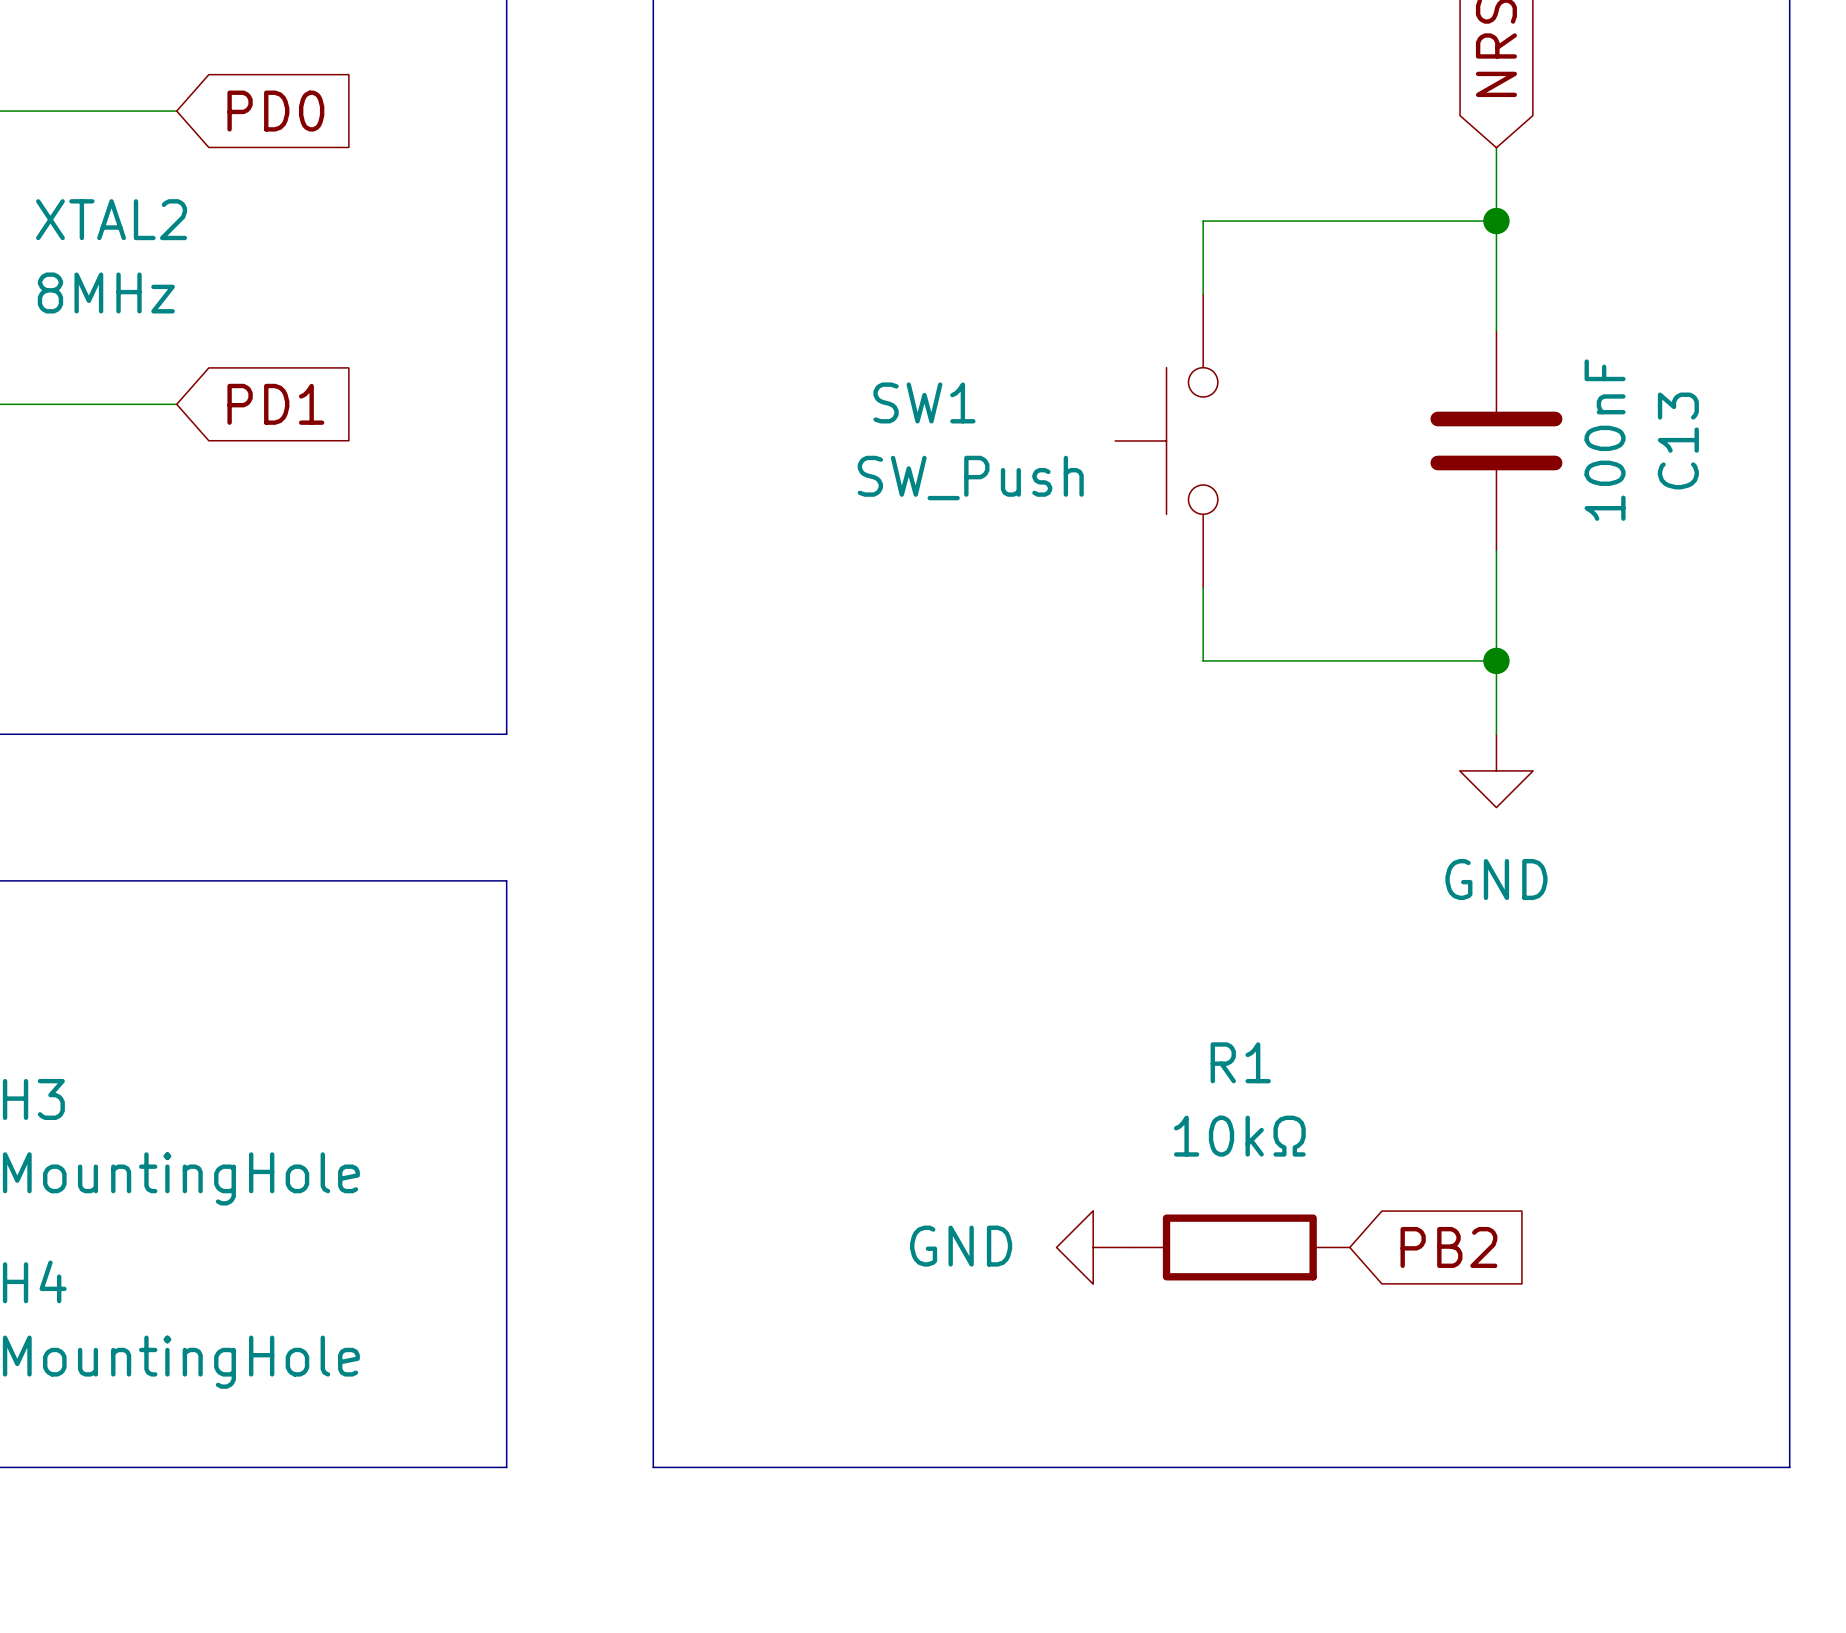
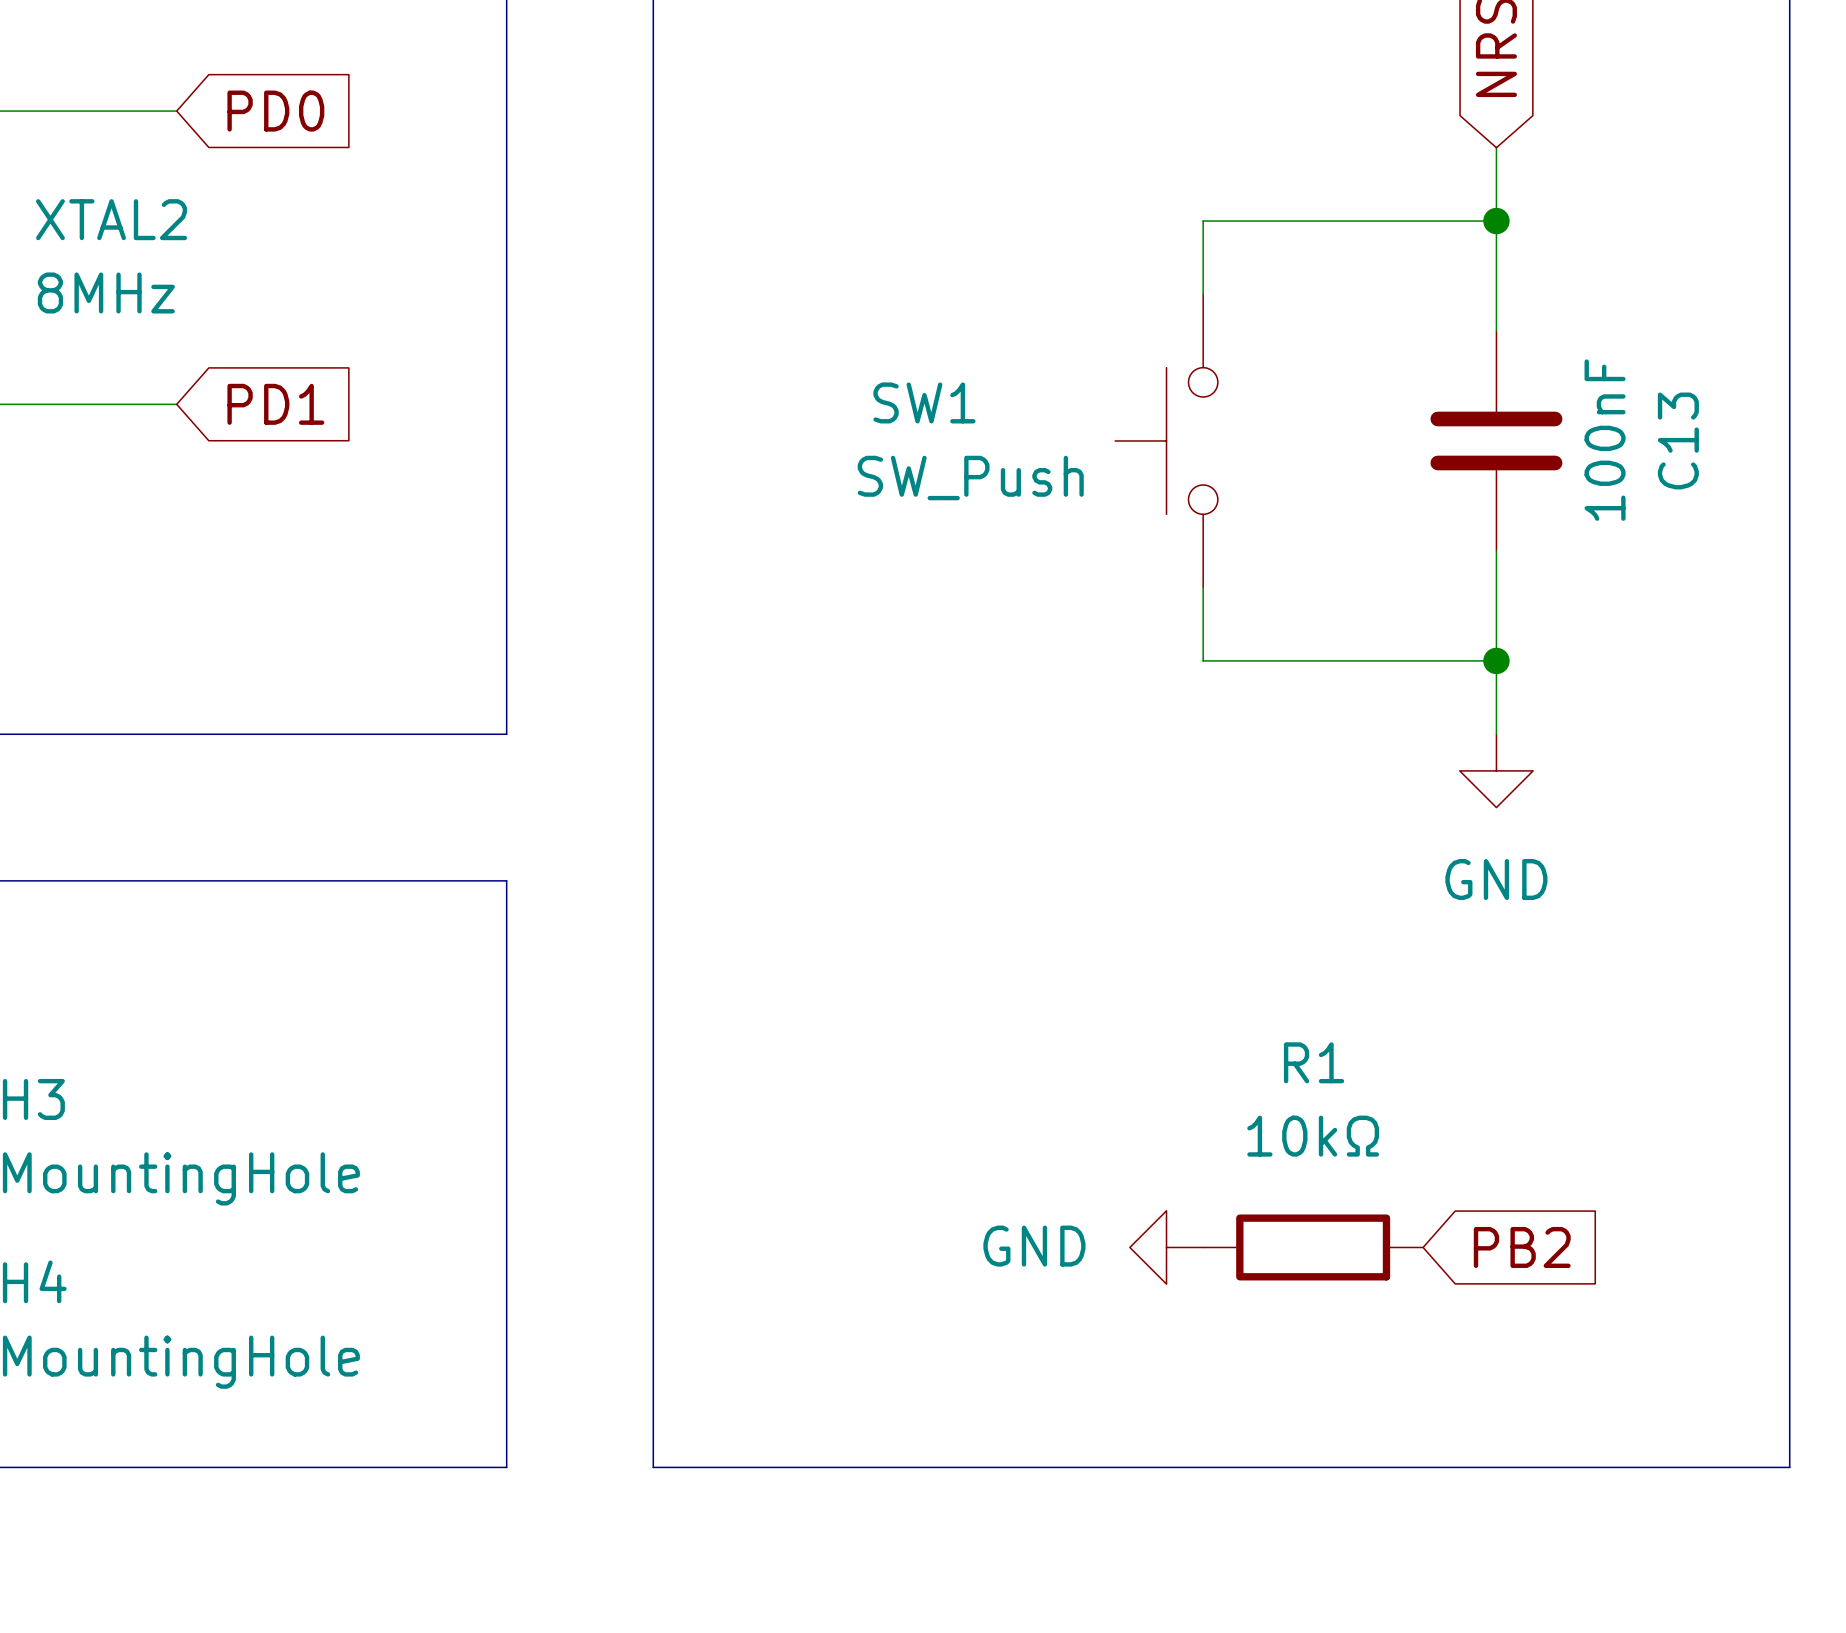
power symbol position: GND (1093, 1247) -> GND (1166, 1247)
R1 position: (1239, 1247) -> (1313, 1247)
global label position: PB2 (1448, 1247) -> PB2 (1522, 1247)

